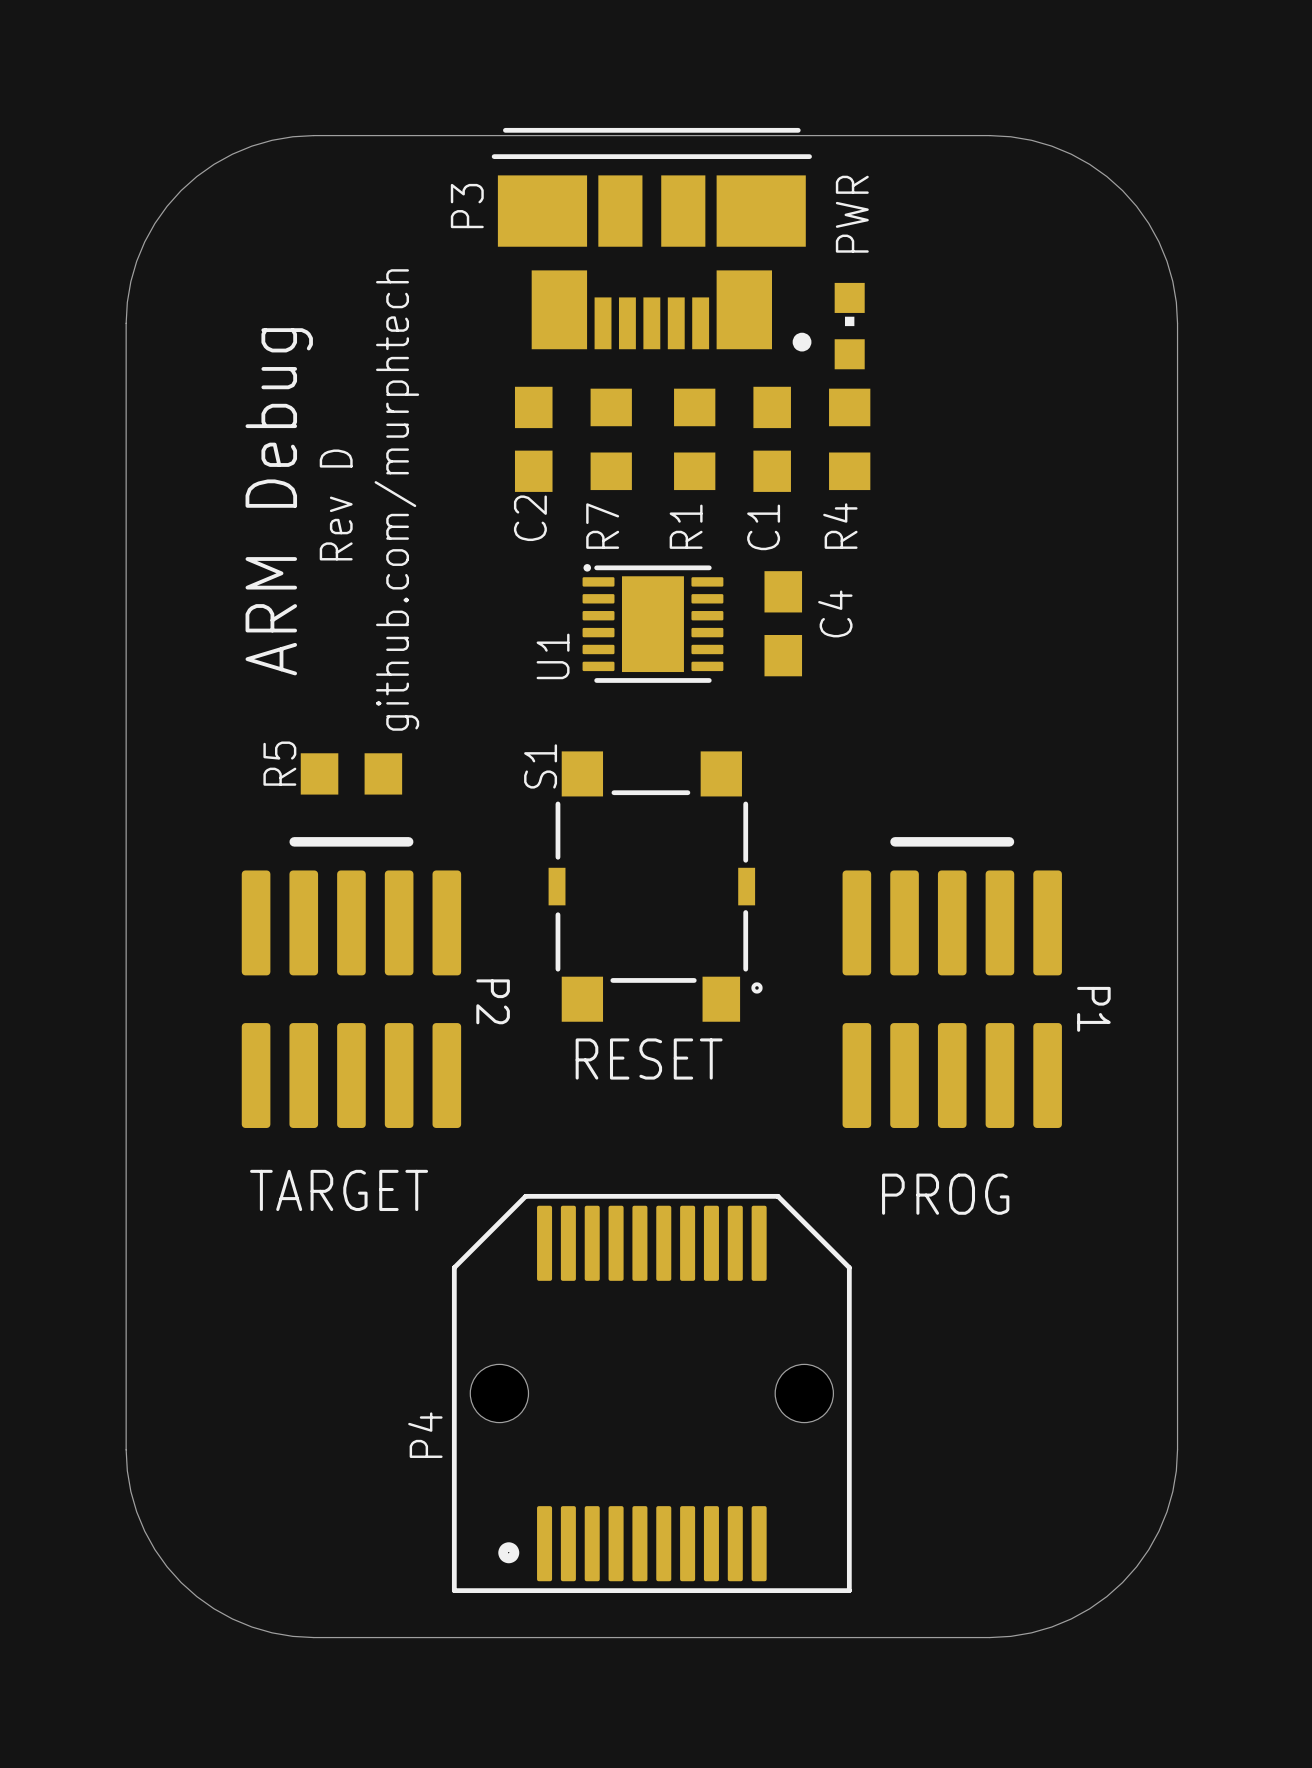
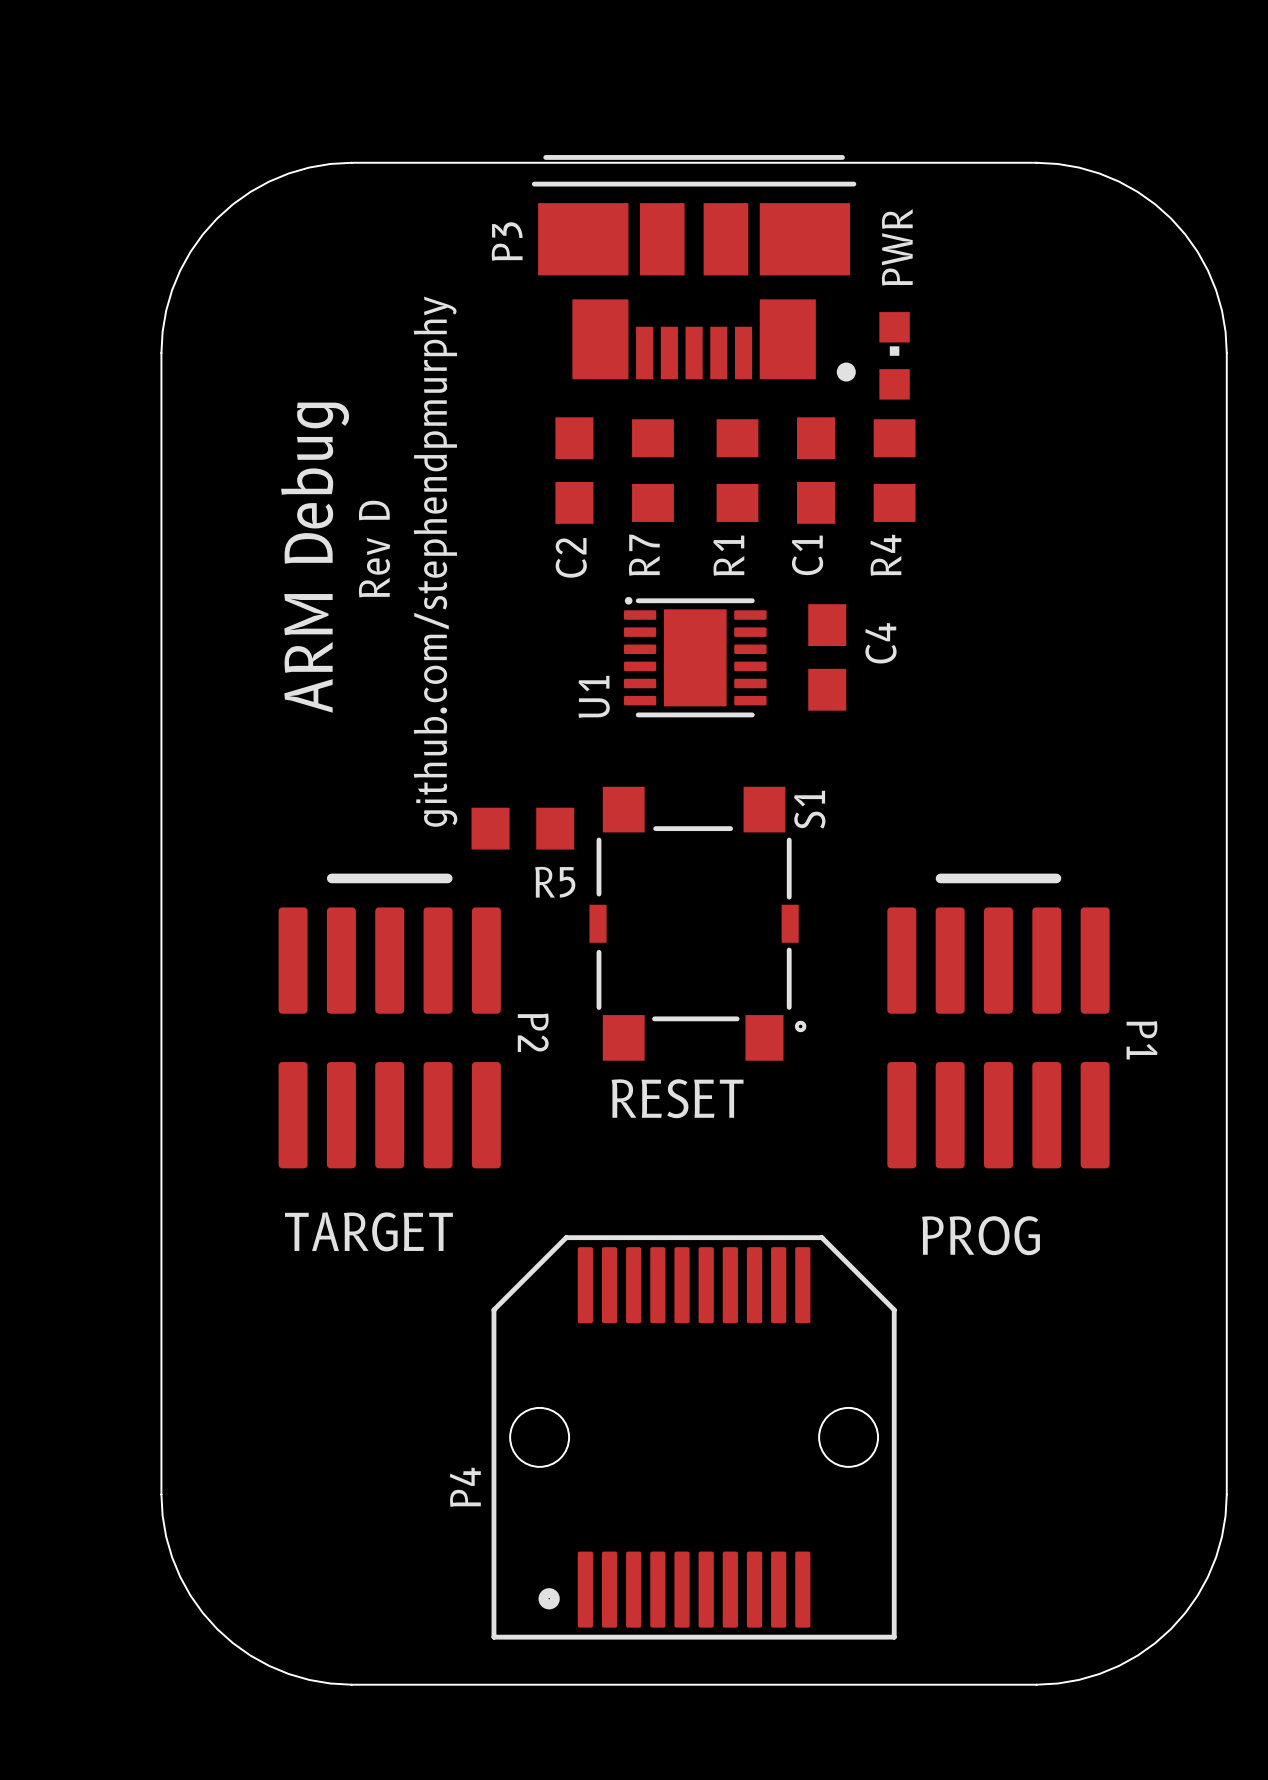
text: github.com/murphtech (396, 499) -> github.com/stephendpmurphy (435, 561)
R5 name rotation: 0° (279, 763) -> 90° clockwise (555, 882)
R5 name position: R5 (279, 763) -> R5 (555, 882)
S1 name position: S1 (540, 766) -> S1 (809, 809)
R5 position: (351, 773) -> (522, 828)

